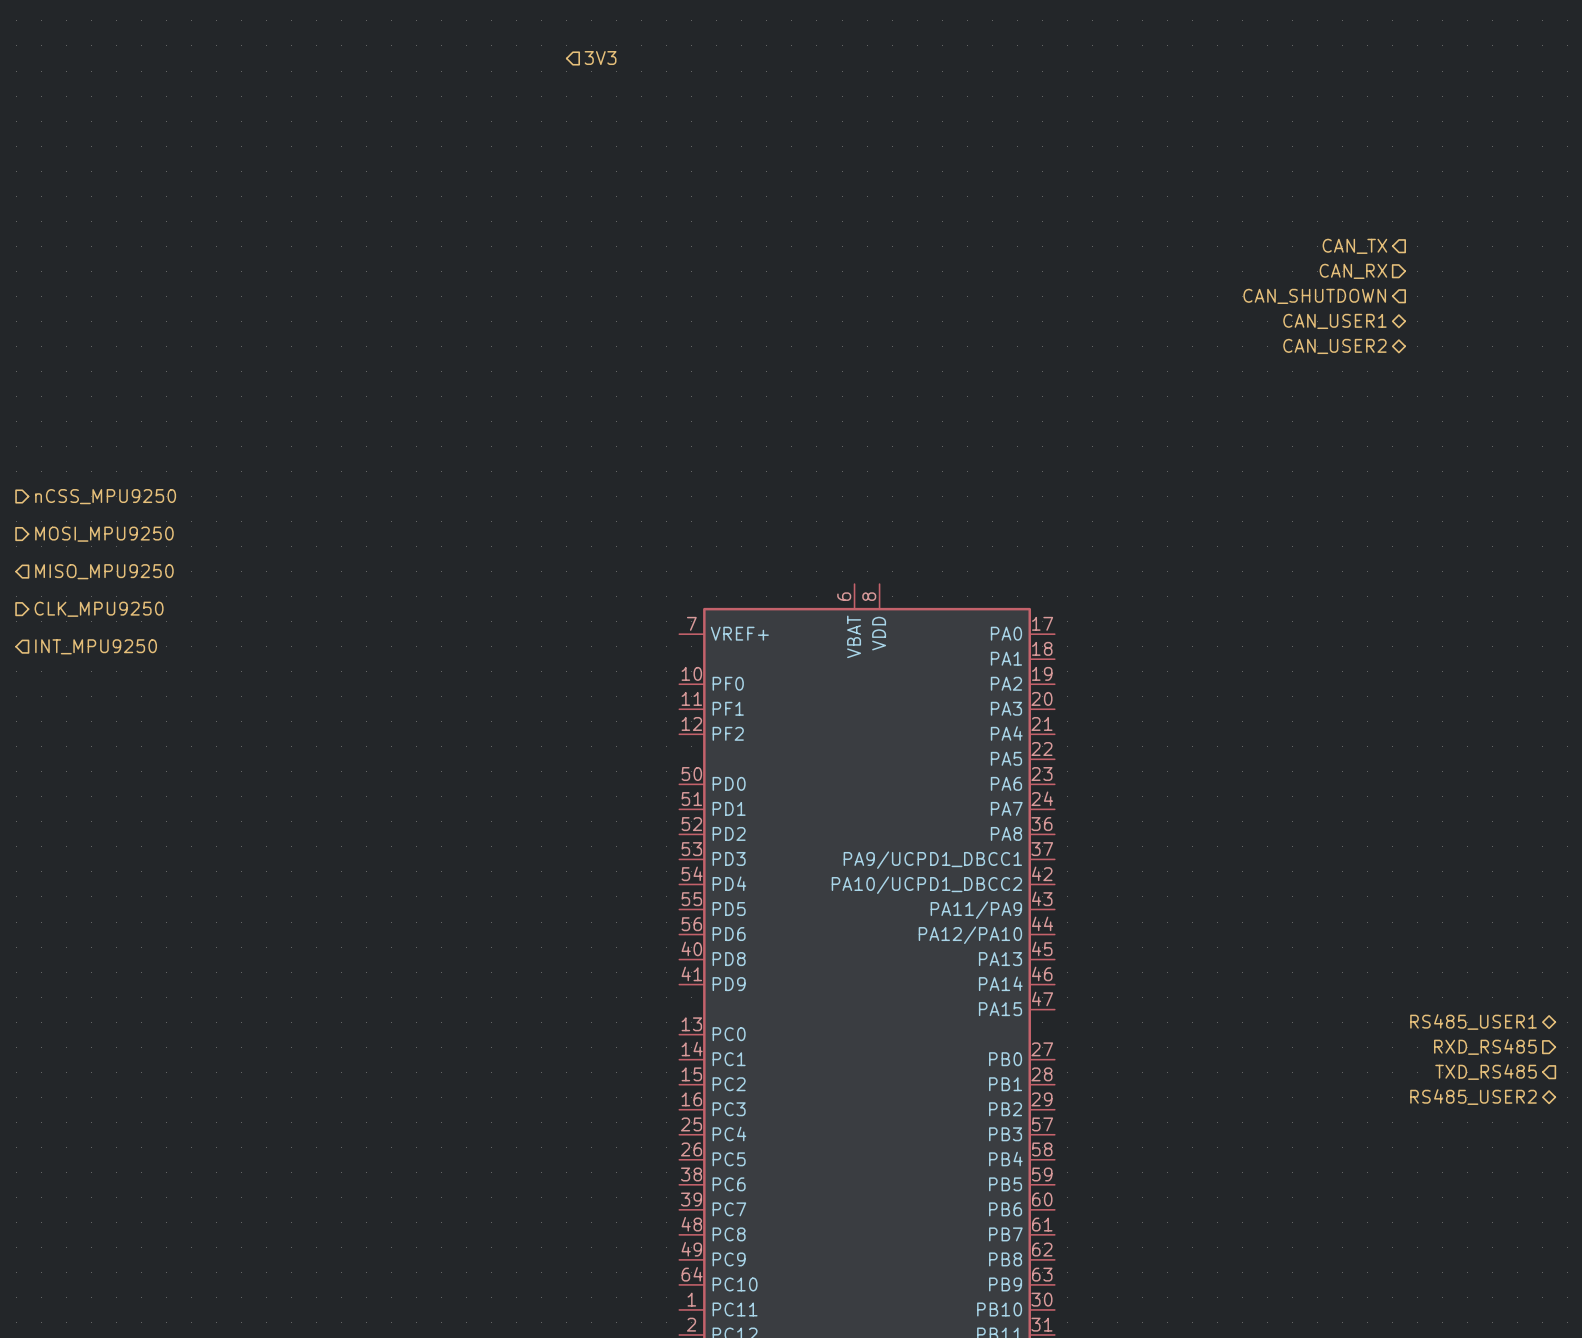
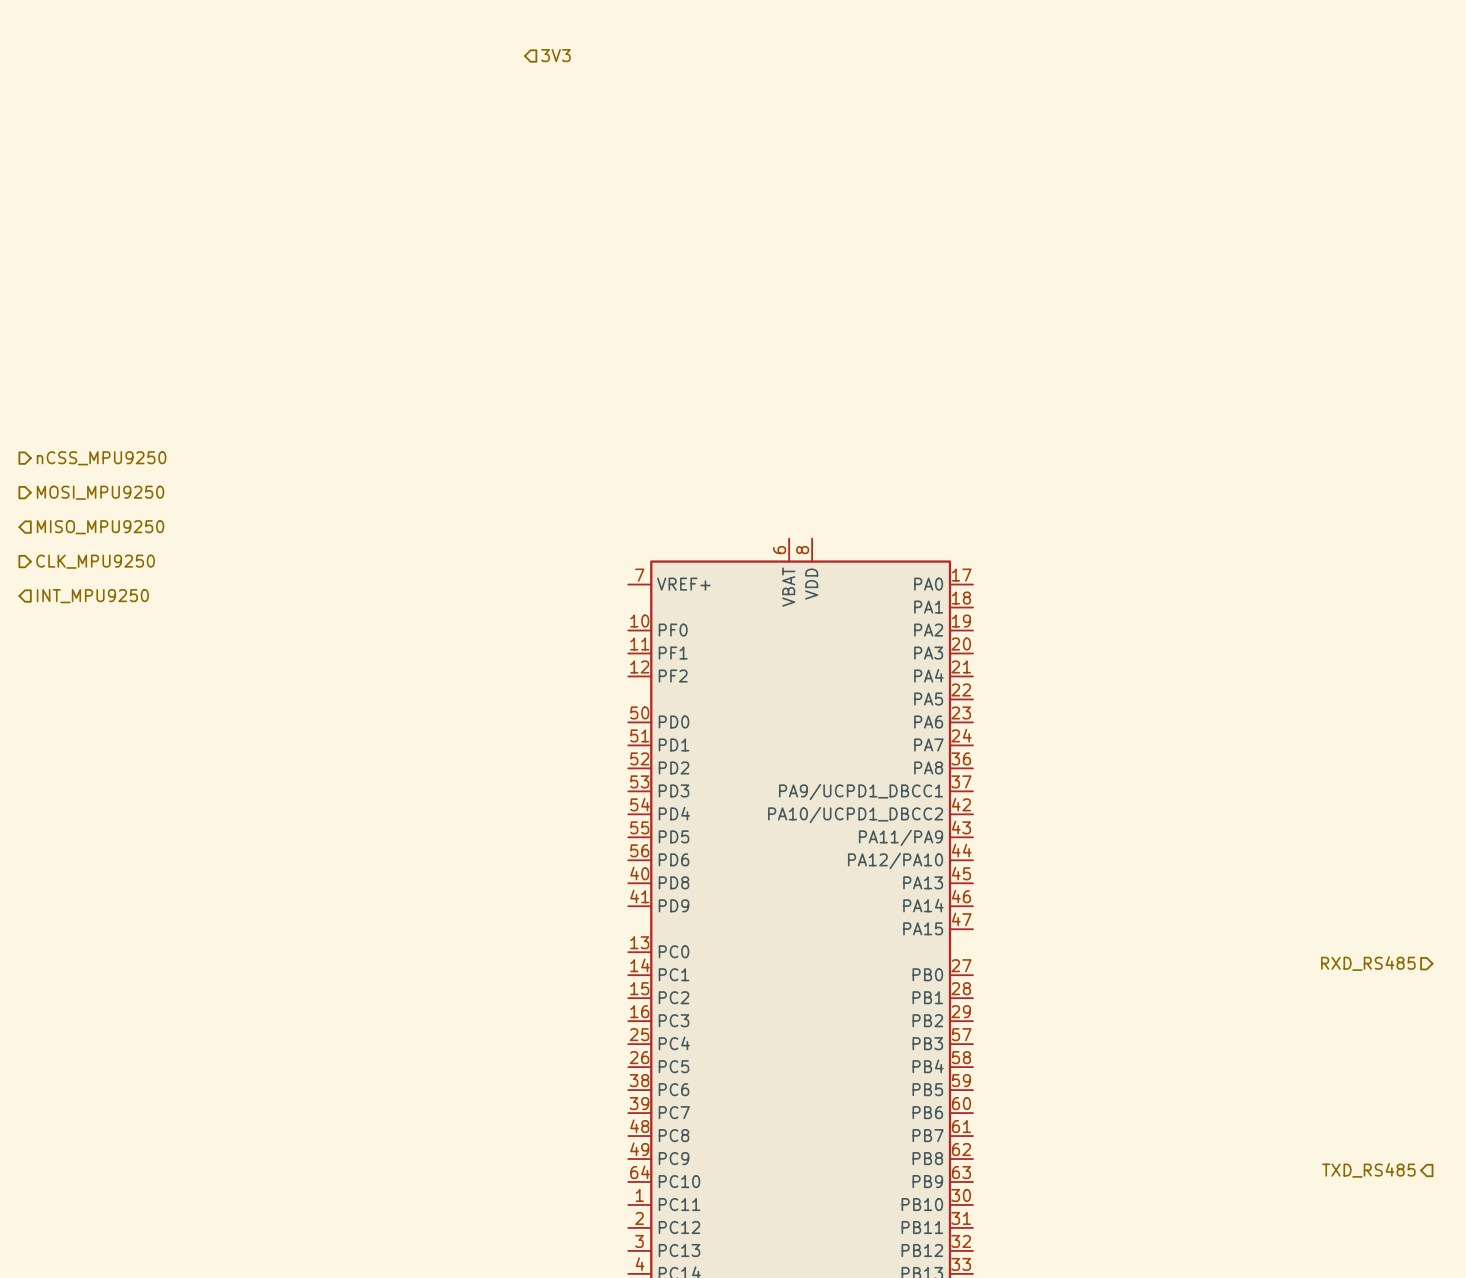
hierarchical label: CAN_TX (1354, 246) -> none
hierarchical label: CAN_RX (1353, 271) -> none
hierarchical label: CAN_SHUTDOWN (1314, 296) -> none
hierarchical label: CAN_USER1 (1334, 321) -> none
hierarchical label: CAN_USER2 (1334, 346) -> none
hierarchical label: RS485_USER1 (1473, 1021) -> none
hierarchical label position: TXD_RS485 (1486, 1072) -> TXD_RS485 (1368, 1170)
hierarchical label: RS485_USER2 (1473, 1097) -> none

